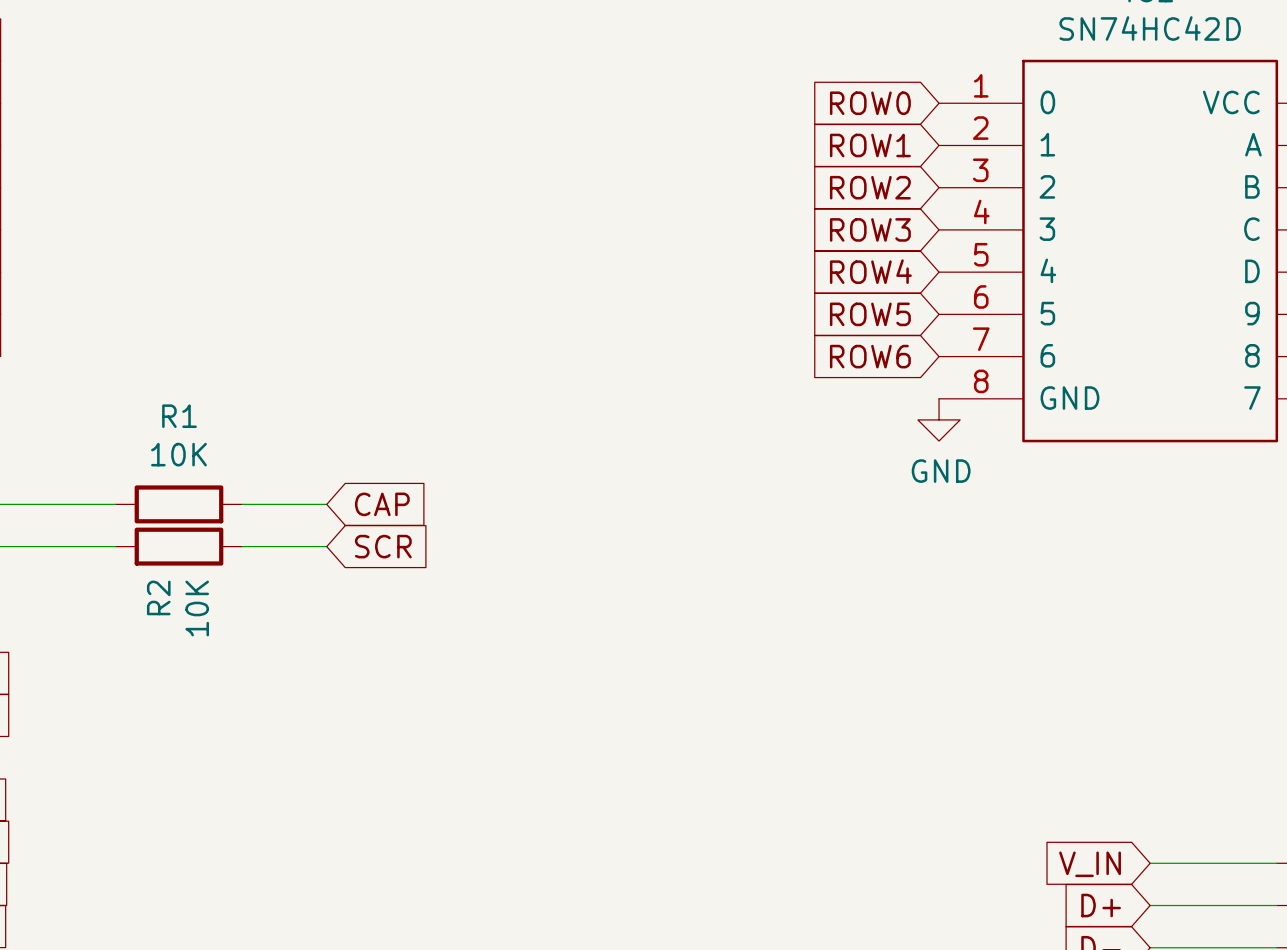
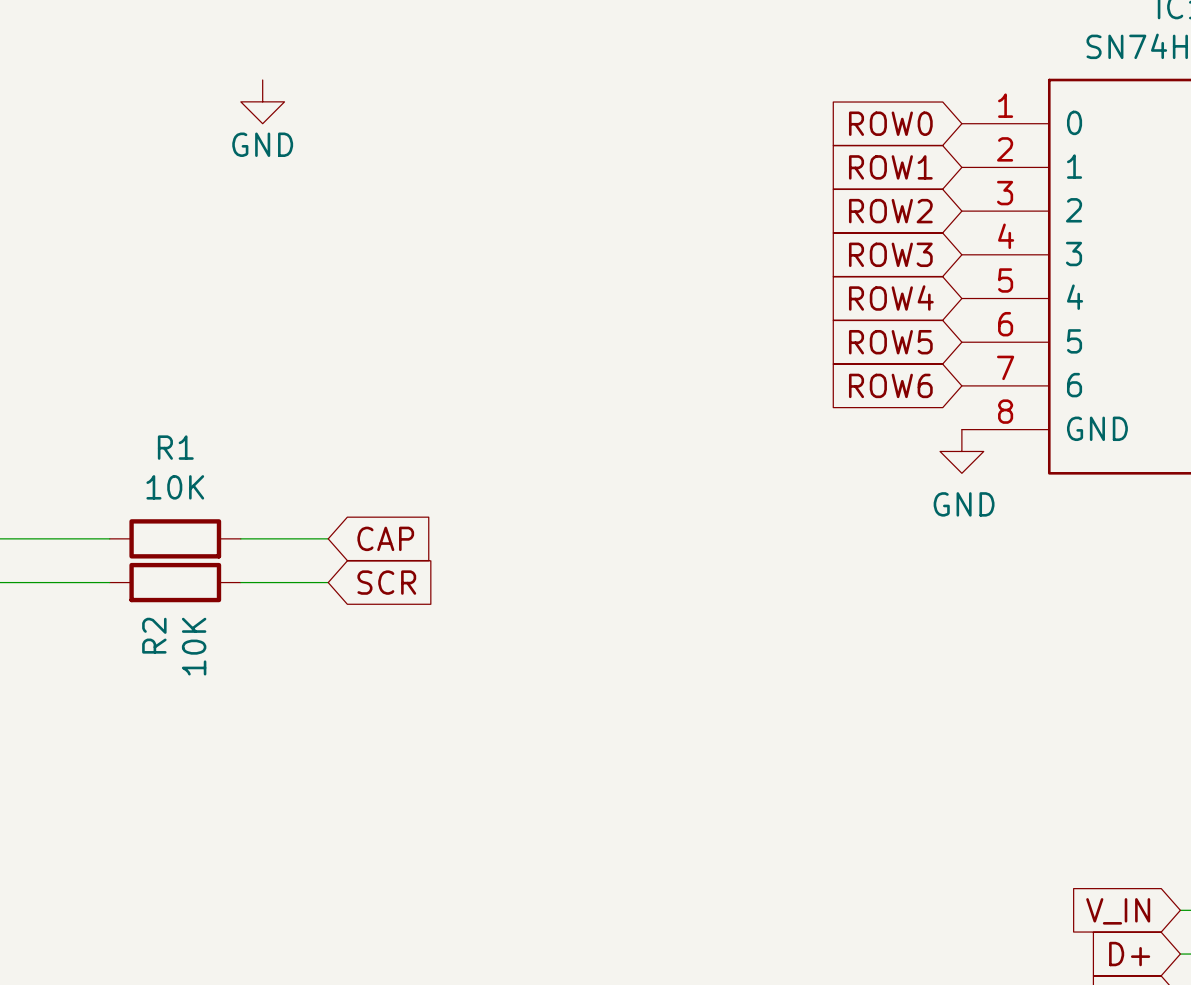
power symbol: none -> GND (262, 101)

